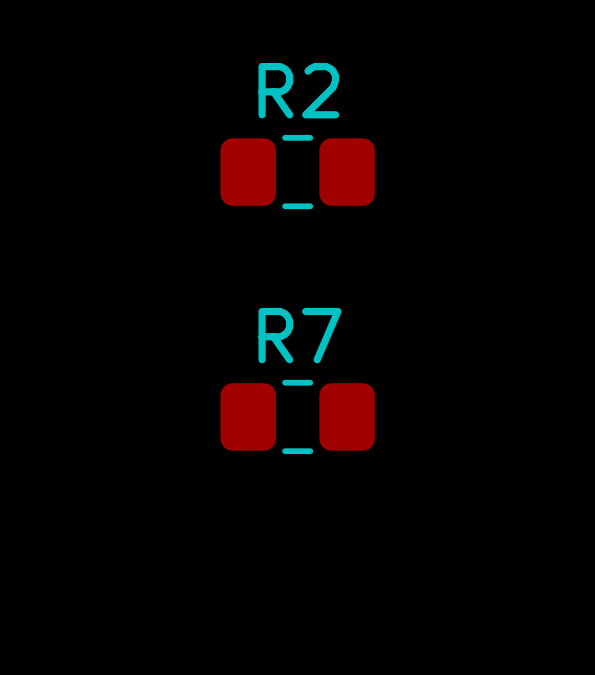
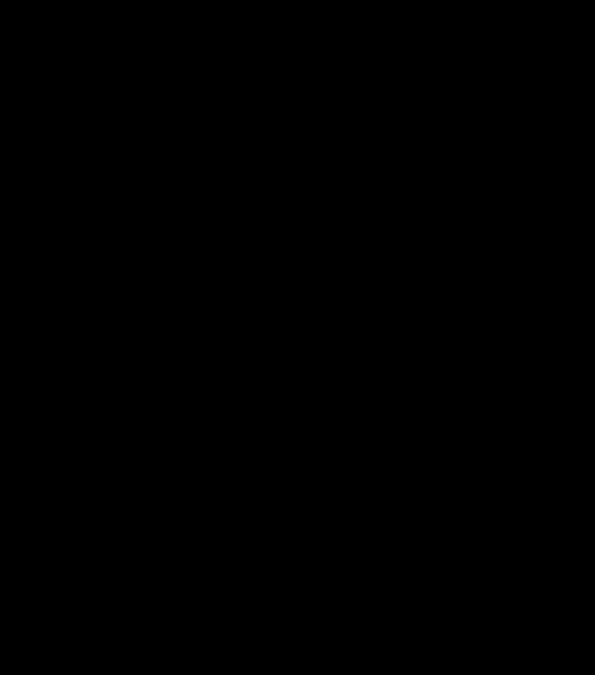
R2: (297, 172) -> none
R7: (297, 416) -> none

